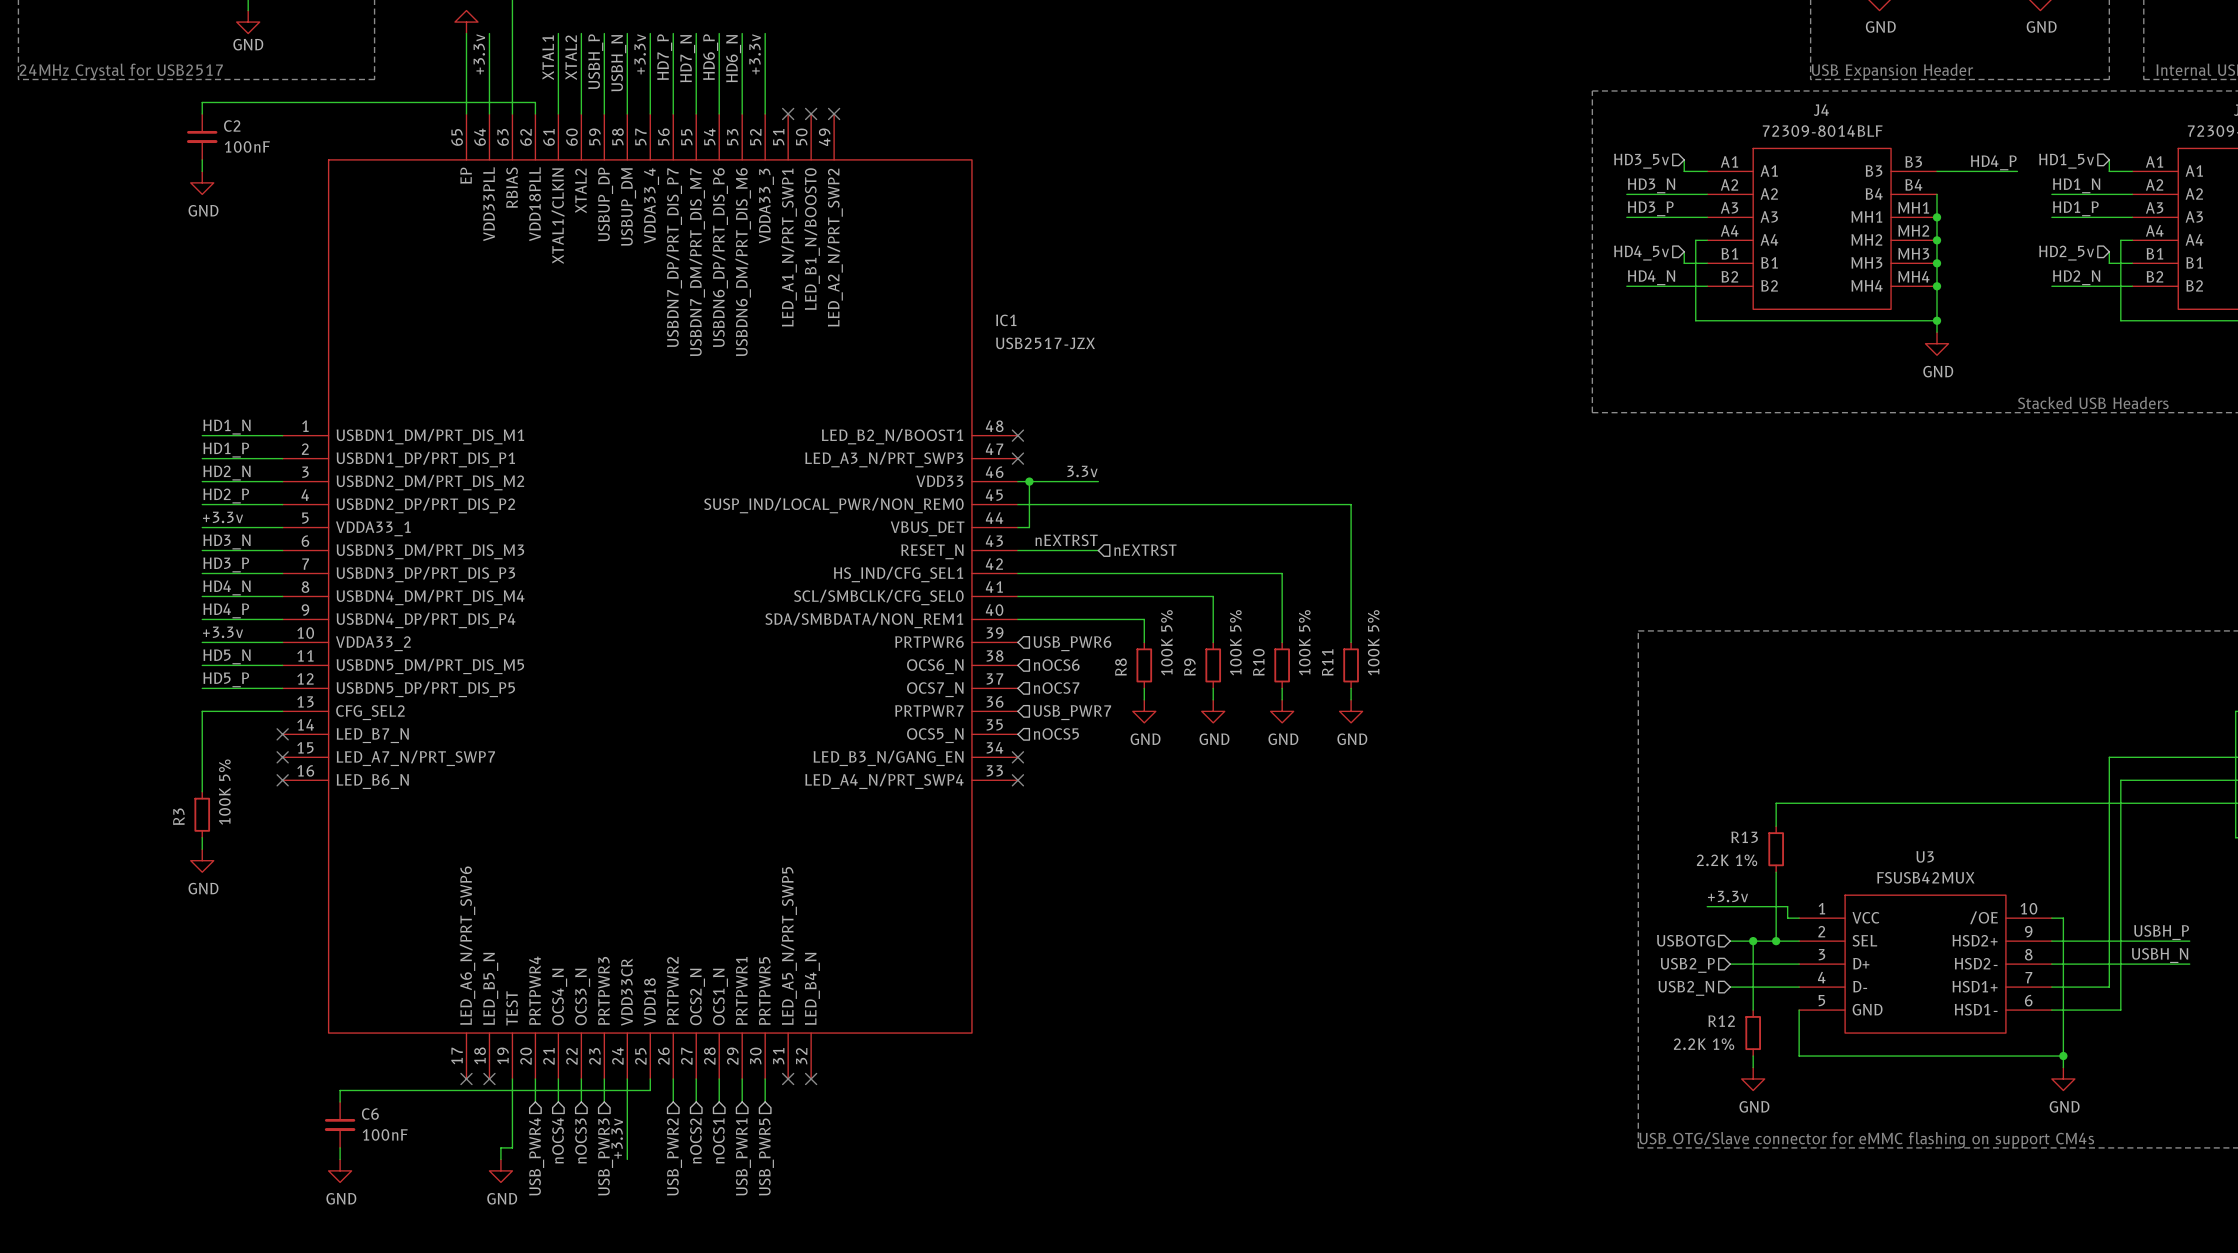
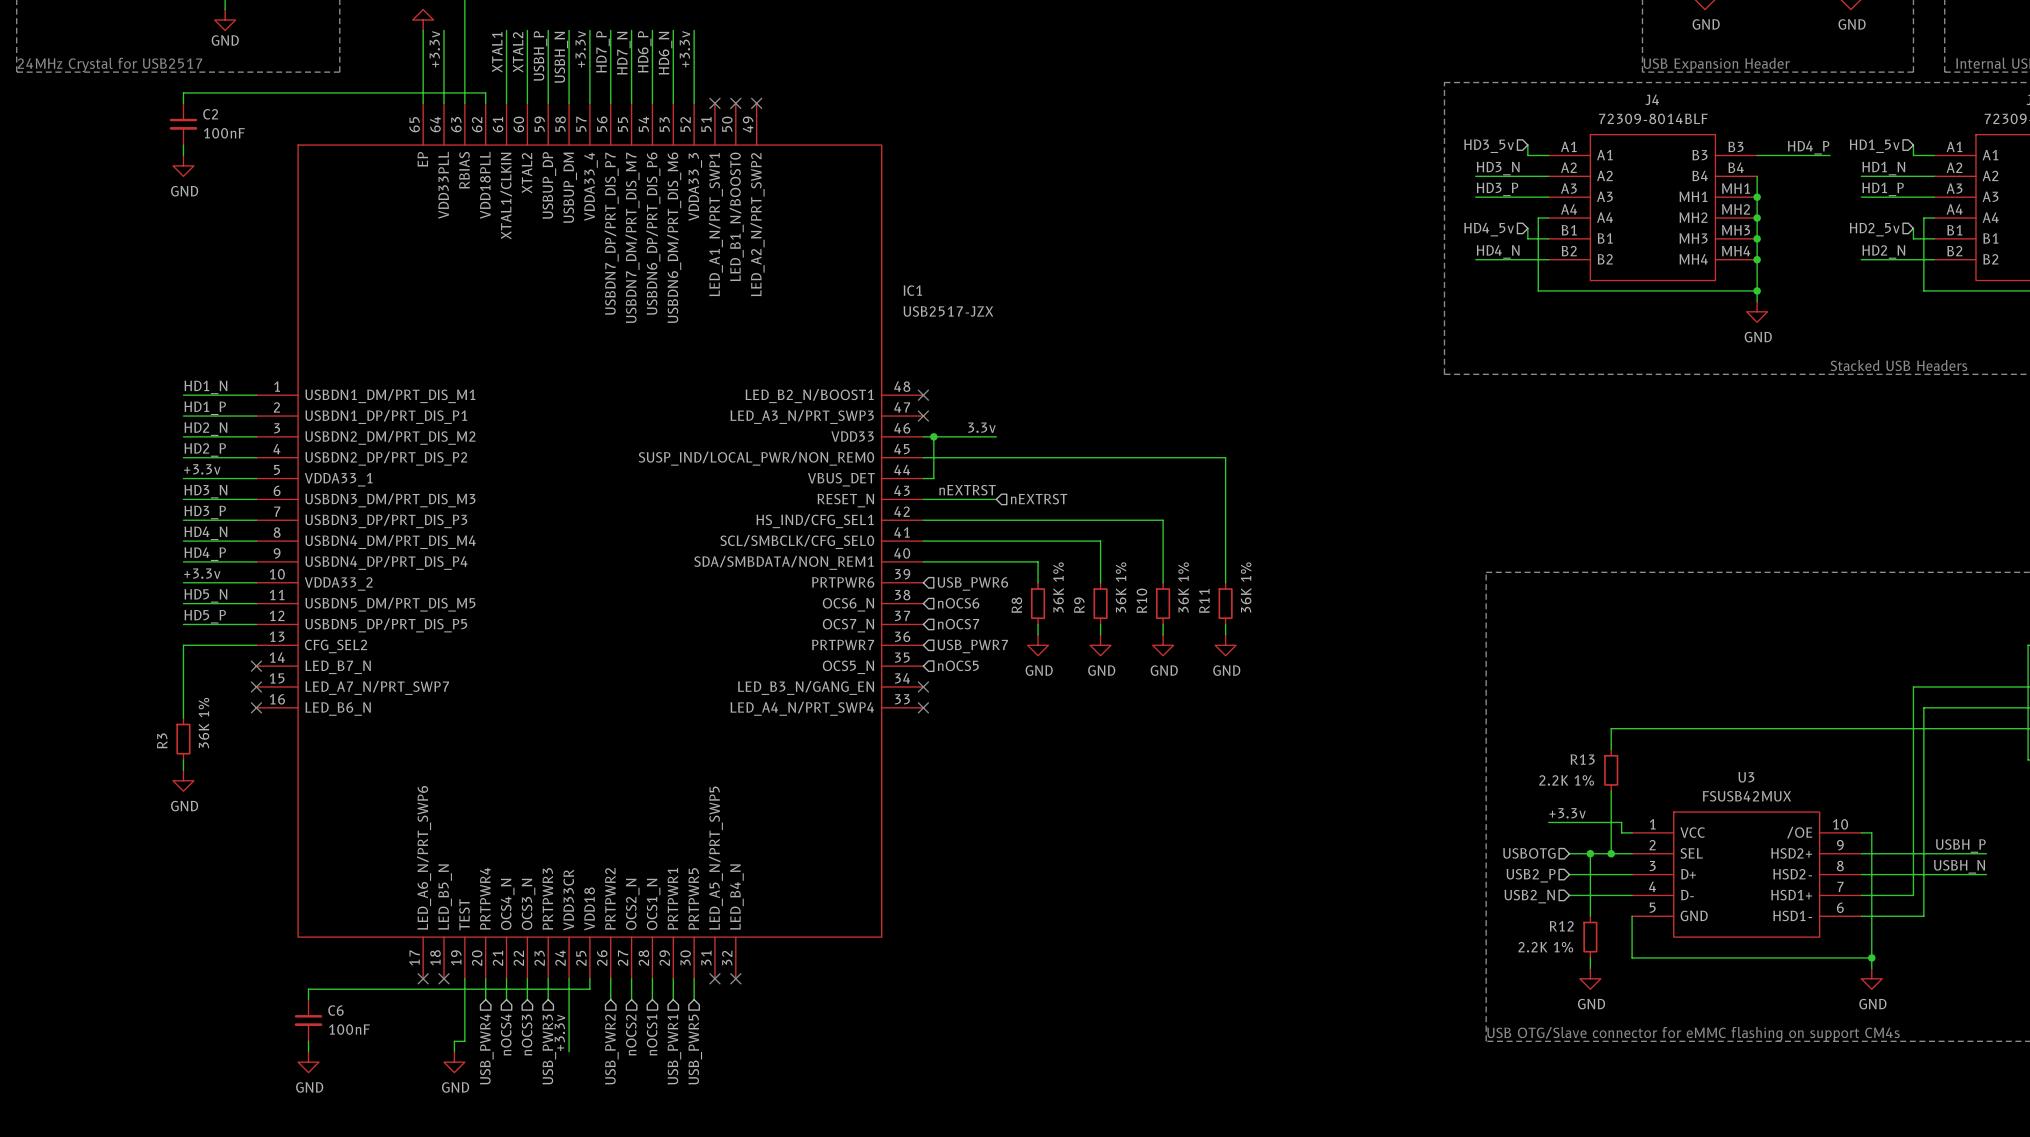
R8 value: 100K 5% (1166, 642) -> 36K 1% (1058, 587)
R9 value: 100K 5% (1235, 642) -> 36K 1% (1121, 587)
R10 value: 100K 5% (1304, 642) -> 36K 1% (1183, 587)
R11 value: 100K 5% (1373, 642) -> 36K 1% (1246, 587)
R3 value: 100K 5% (224, 792) -> 36K 1% (203, 723)

